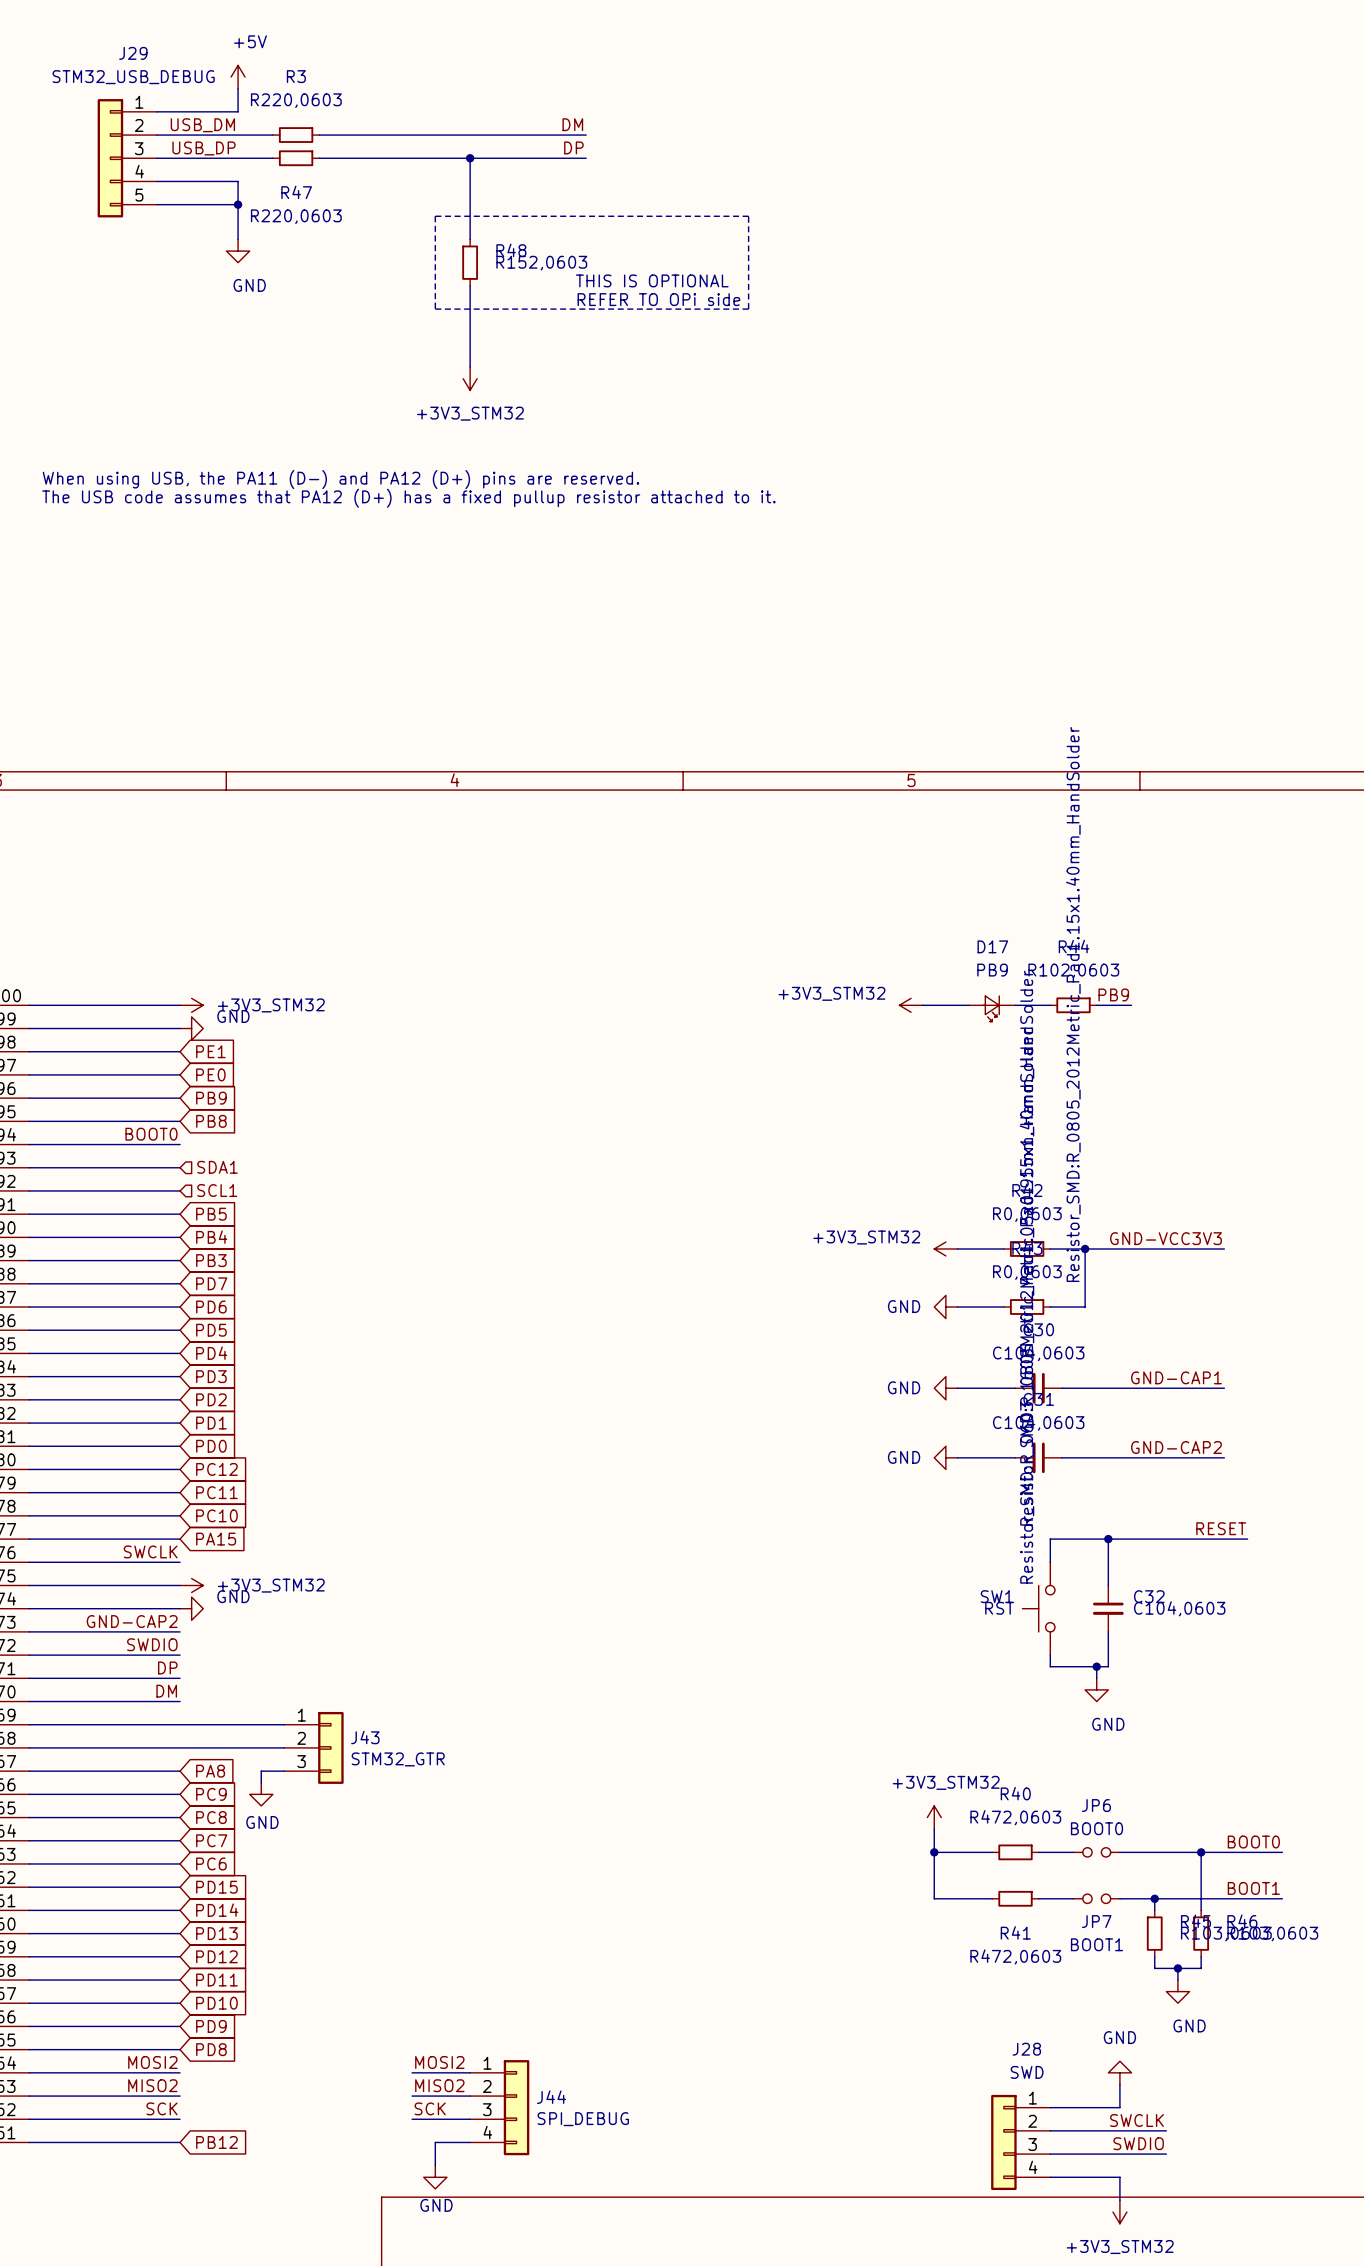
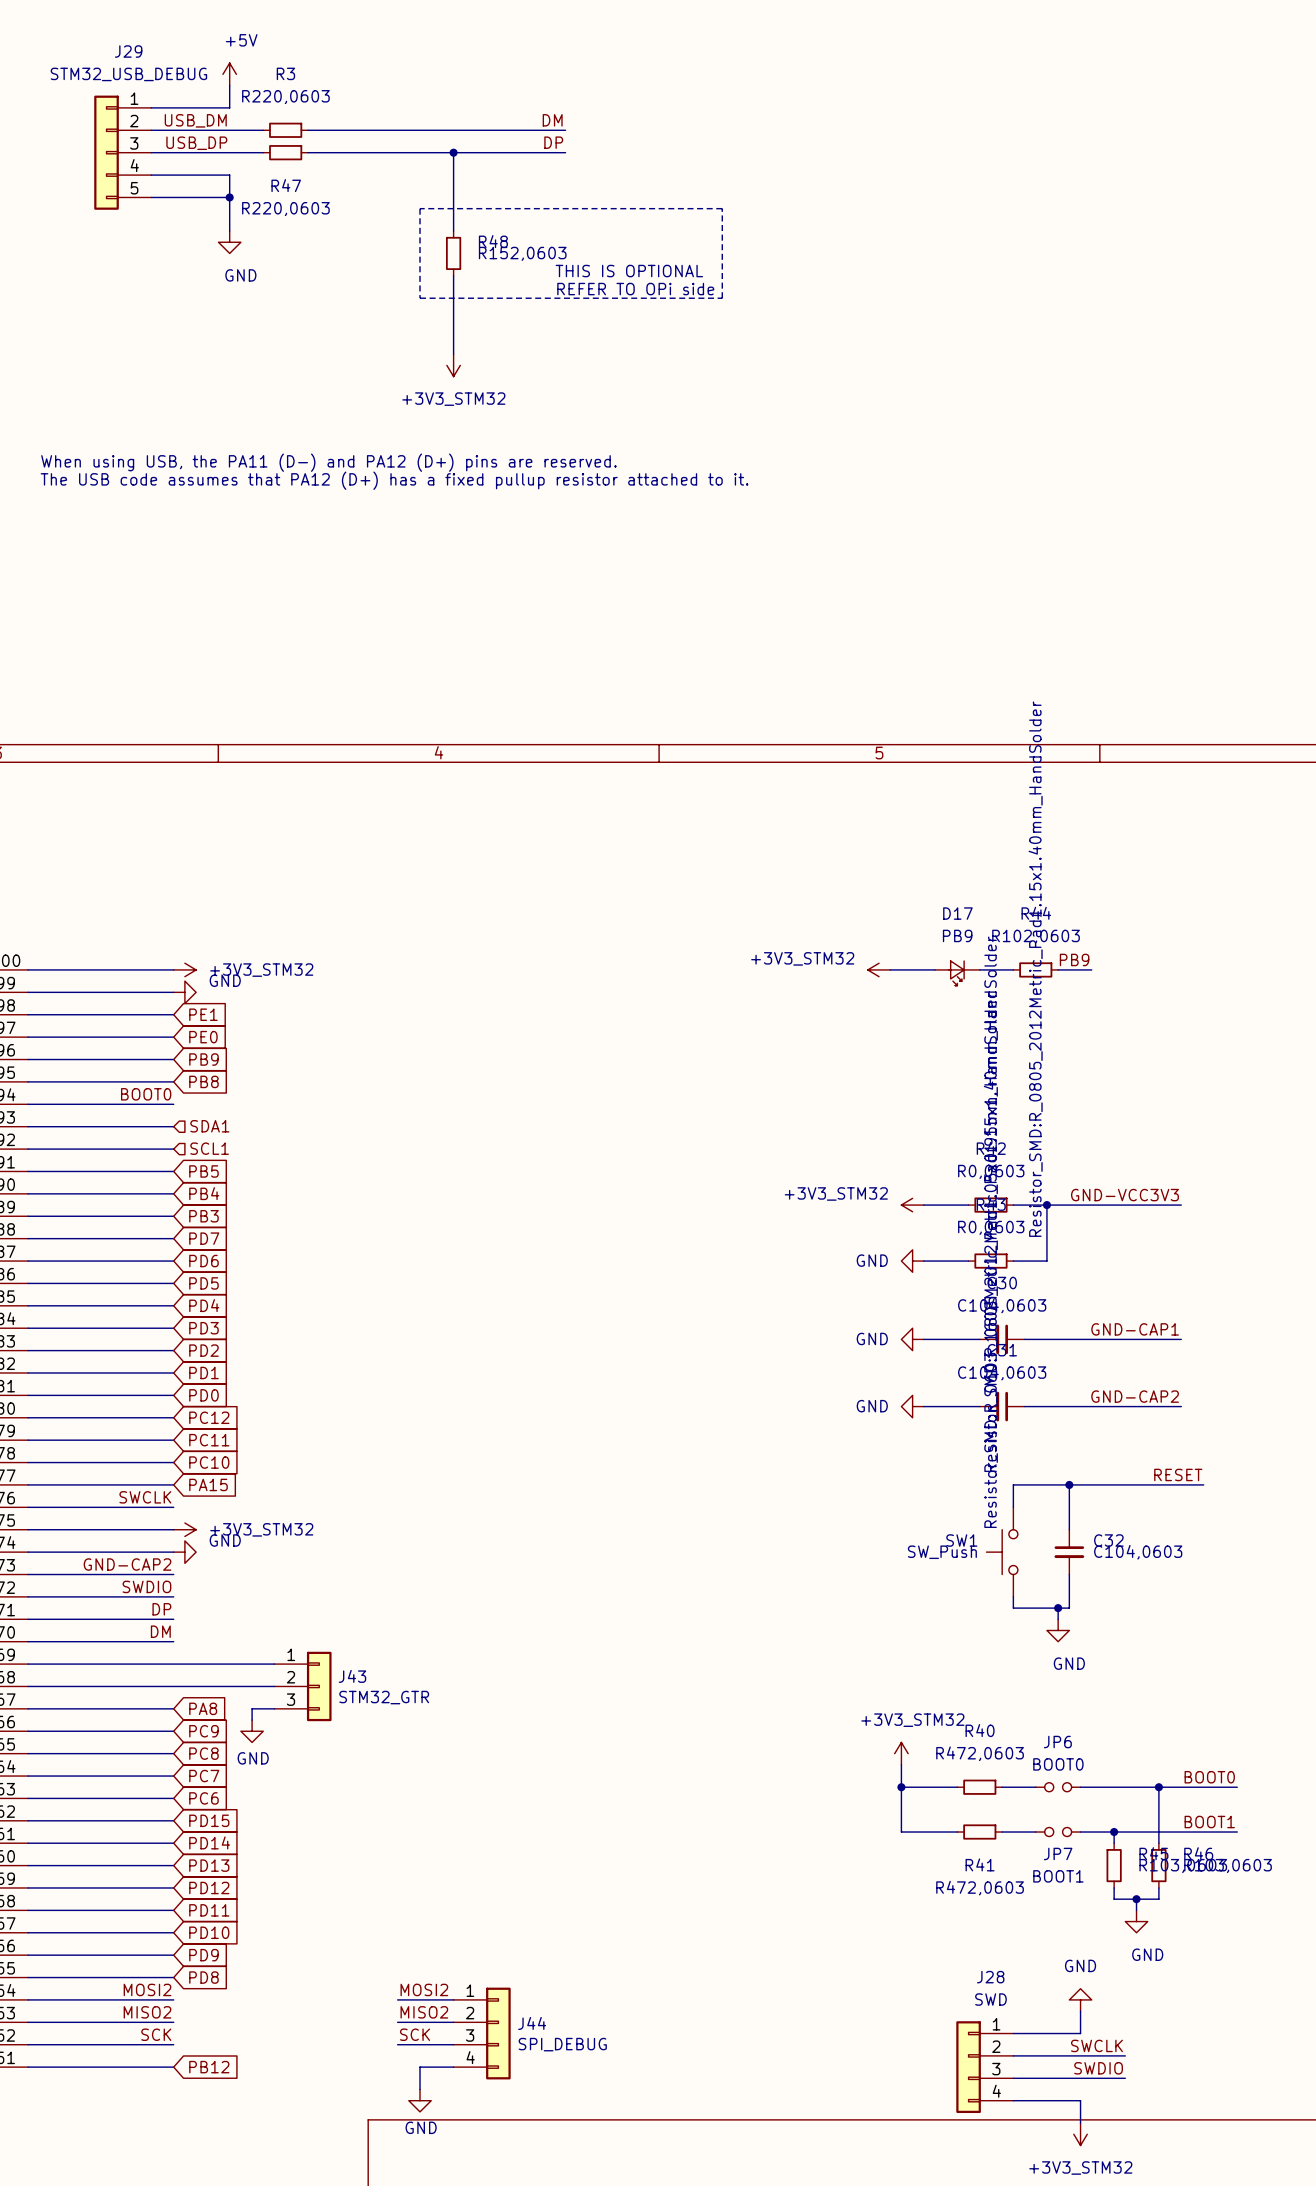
SW1 value: RST (999, 1608) -> SW_Push (942, 1552)

